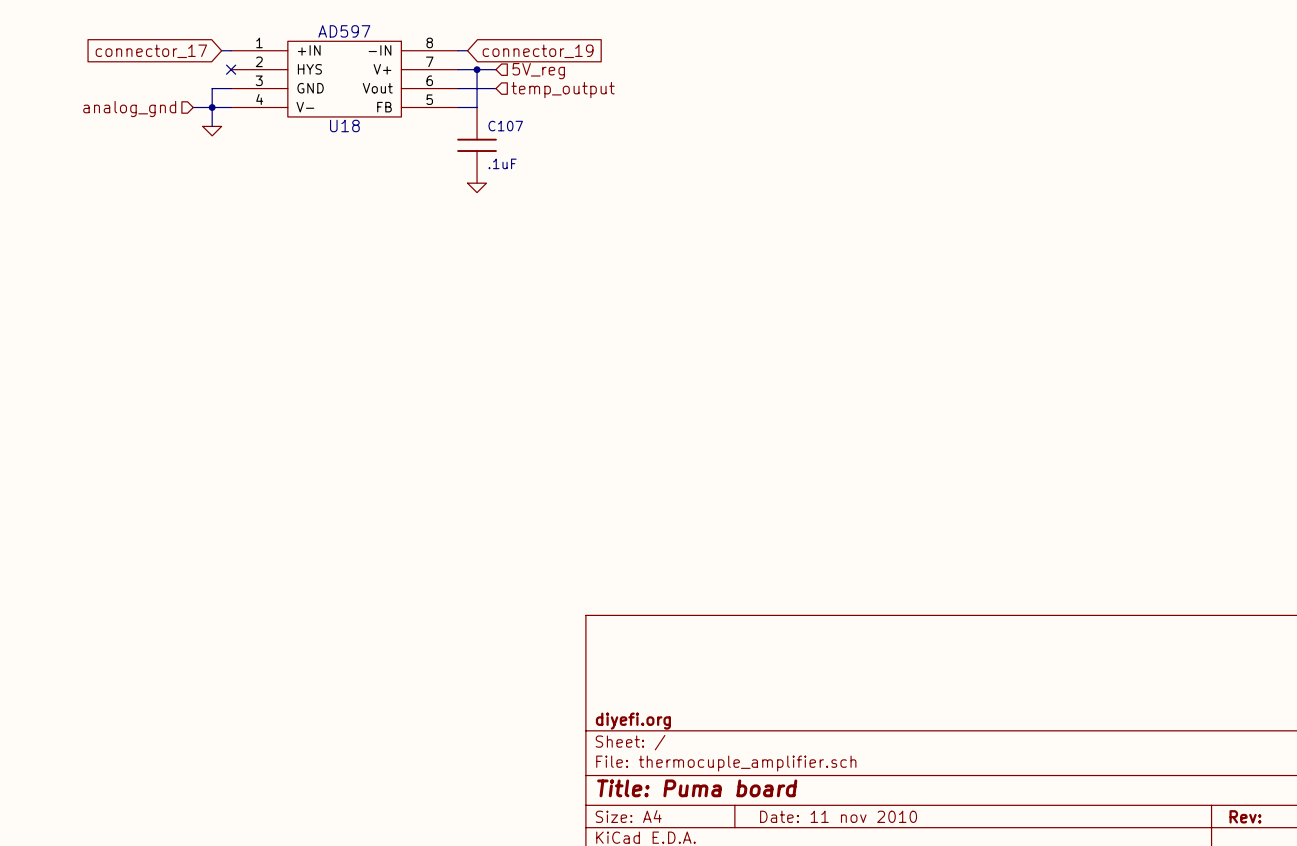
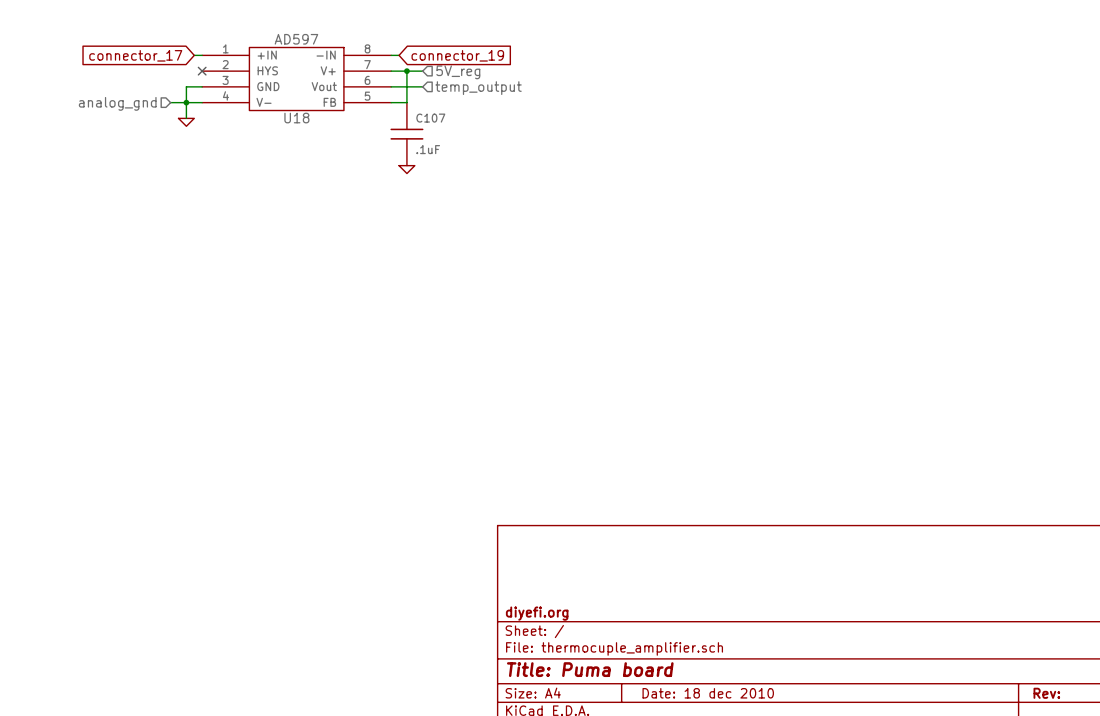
title block: Date: 11 nov 2010 (838, 816) -> Date: 18 dec 2010 (708, 693)

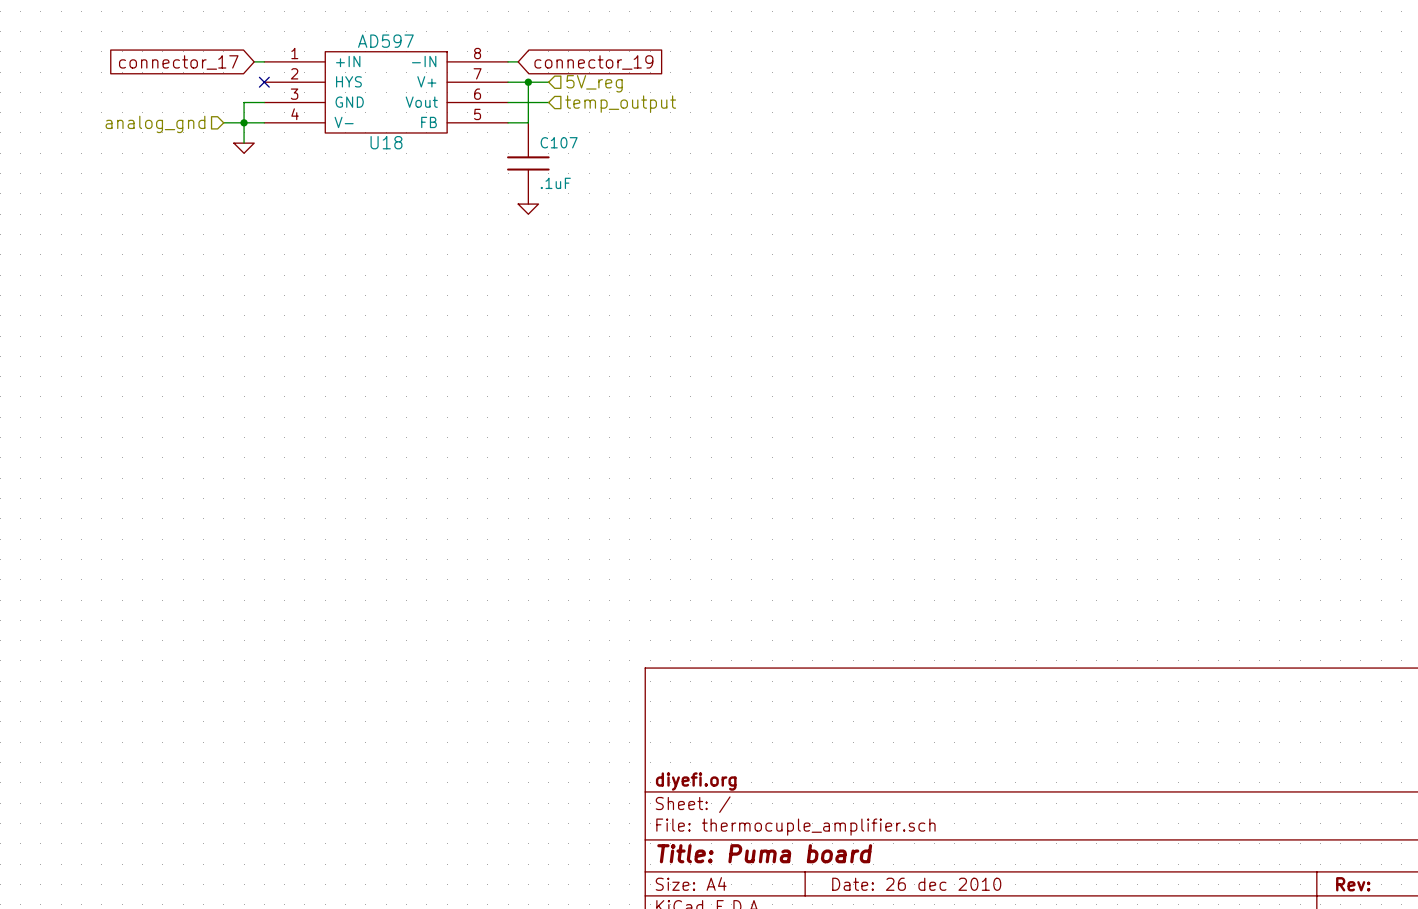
title block: Date: 18 dec 2010 (708, 693) -> Date: 26 dec 2010 (916, 884)

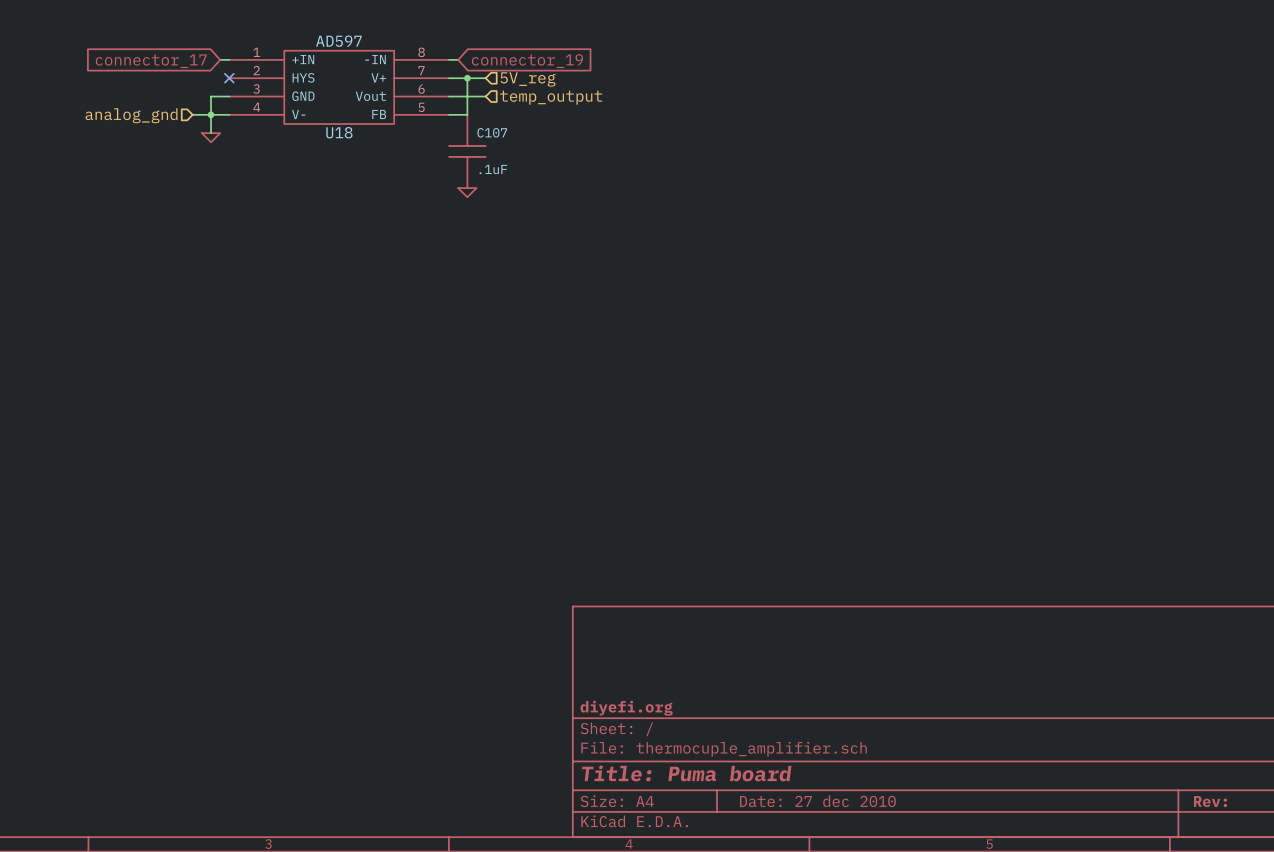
title block: Date: 26 dec 2010 (916, 884) -> Date: 27 dec 2010 (817, 801)

